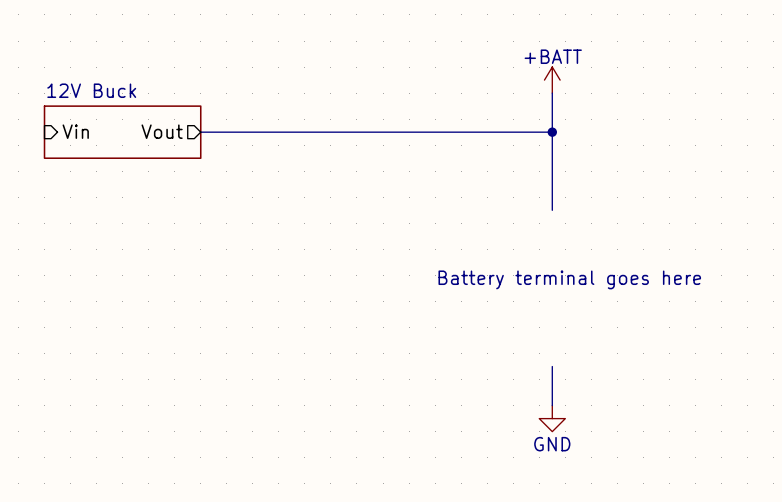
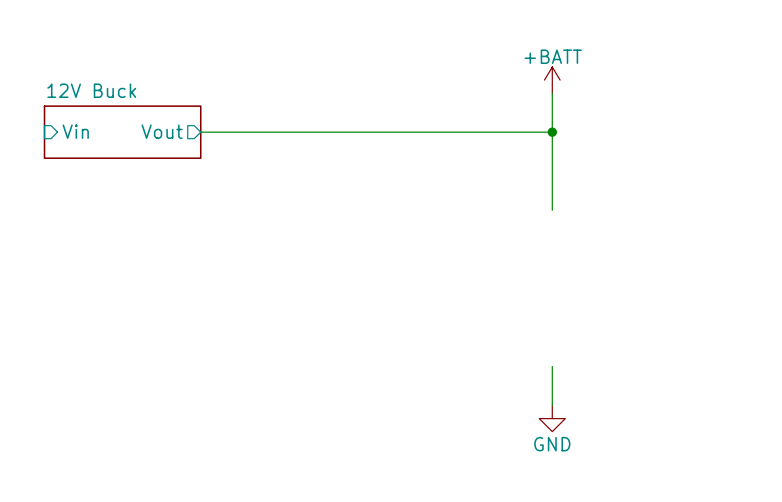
text: Battery terminal goes here (569, 279) -> none

